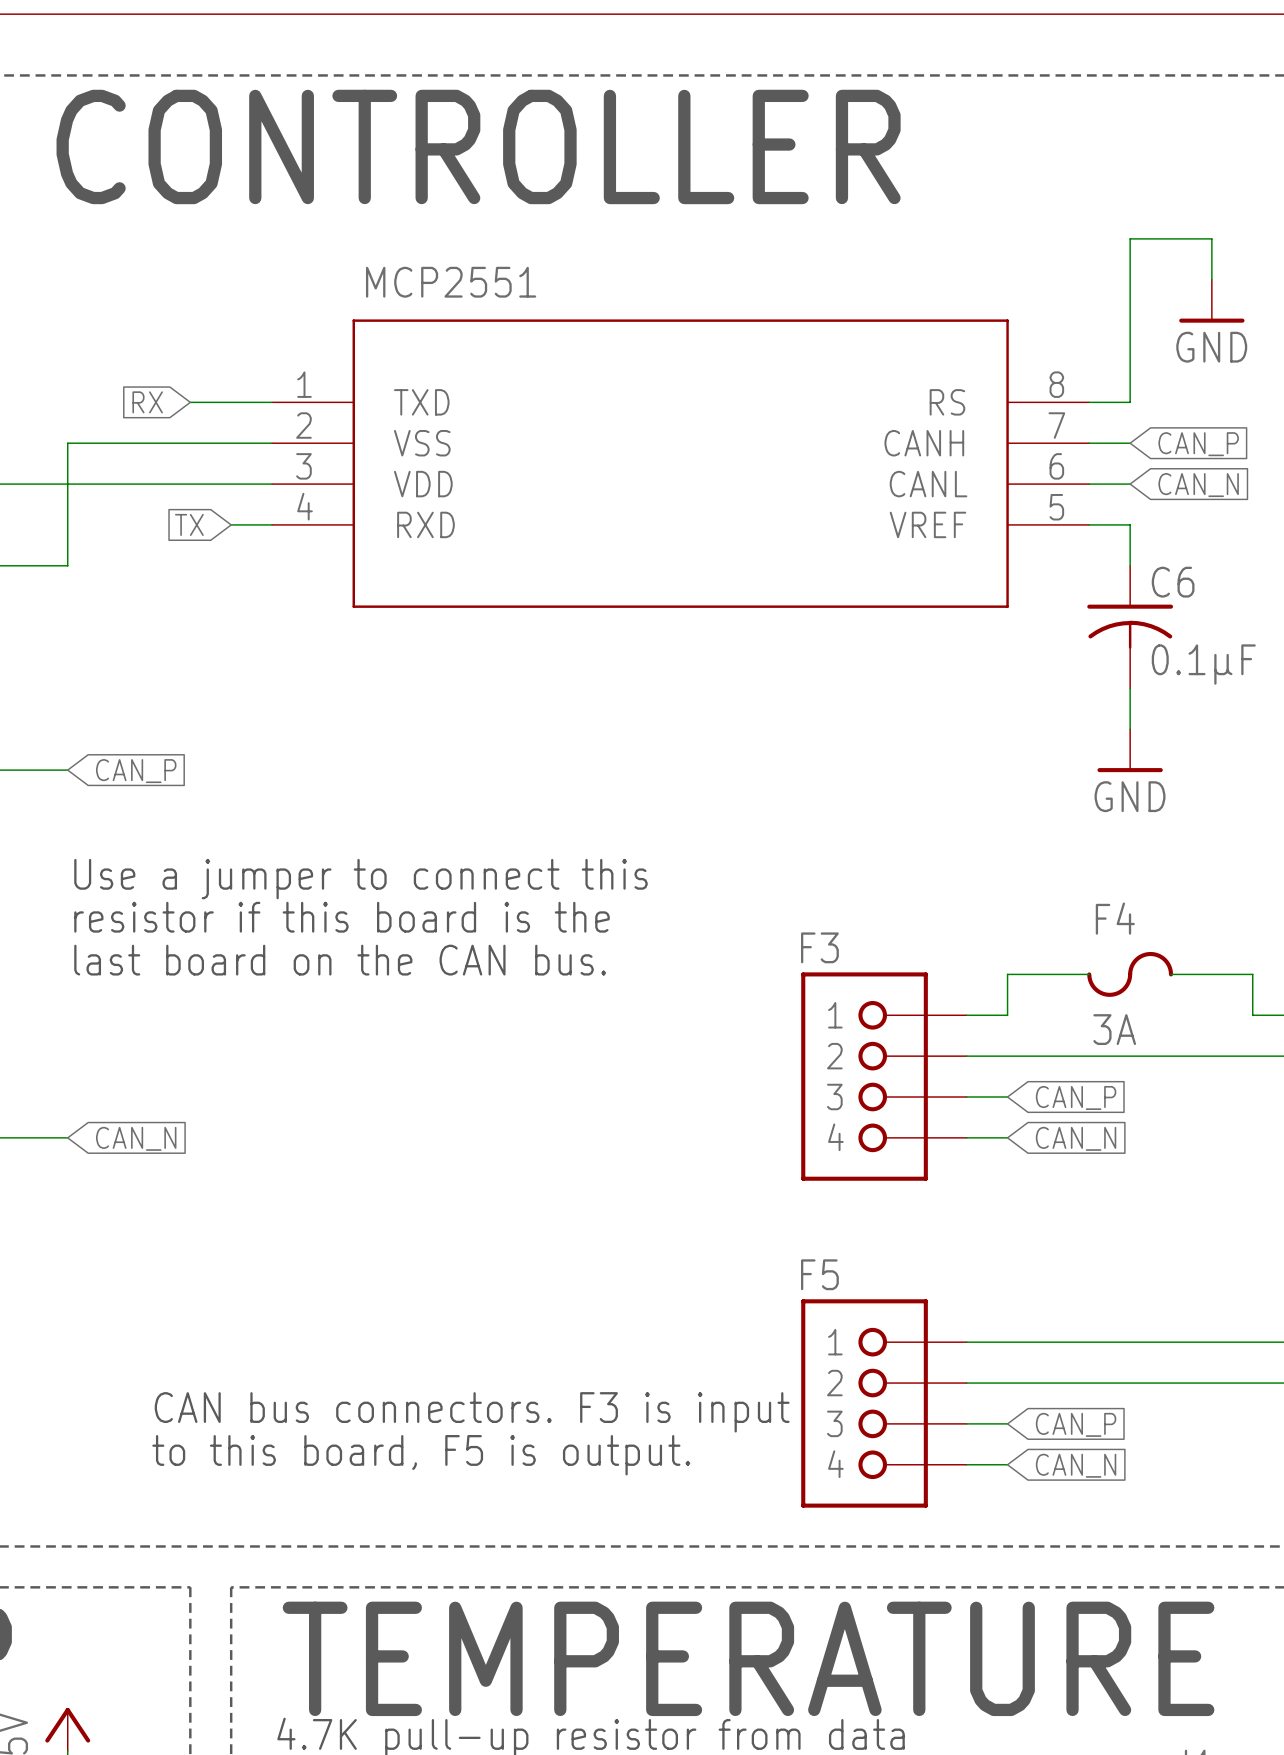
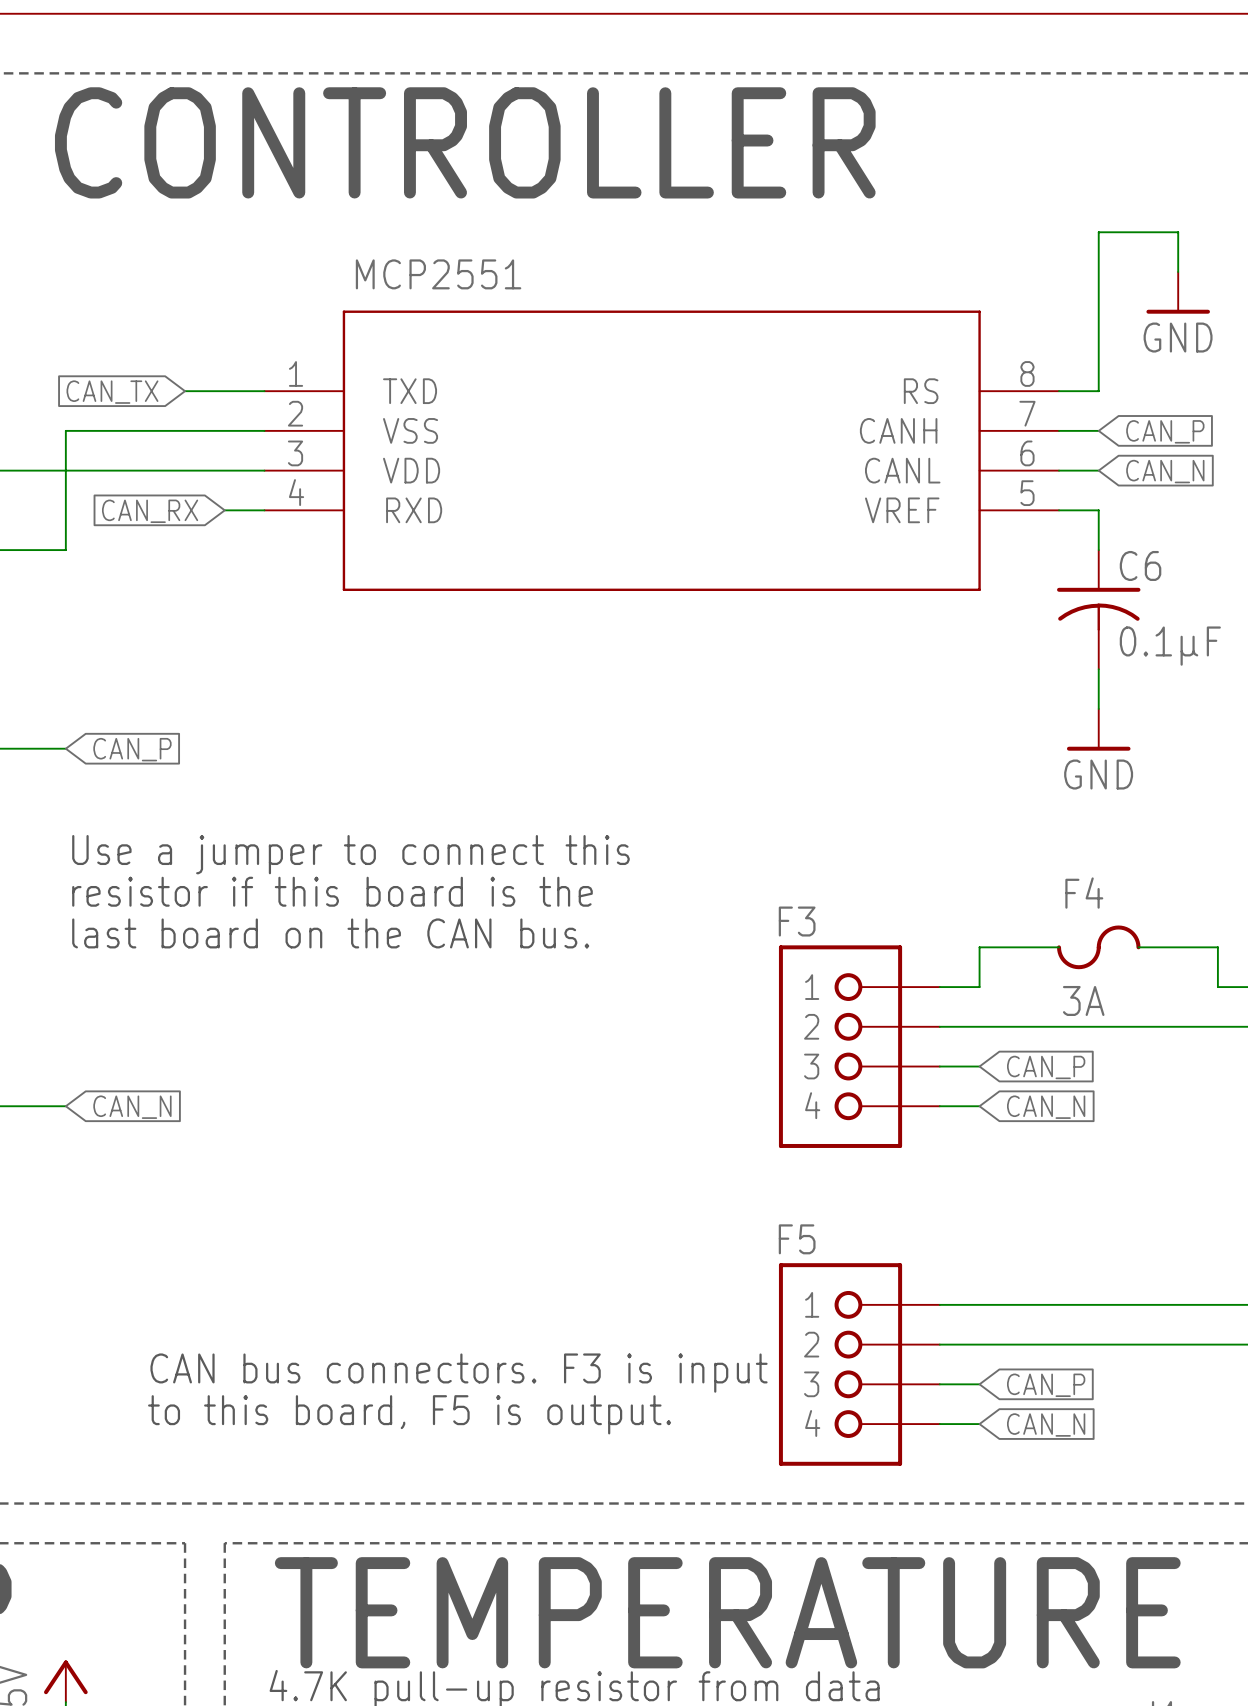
global label: RX (147, 402) -> CAN_TX (112, 392)
global label: TX (189, 524) -> CAN_RX (150, 511)

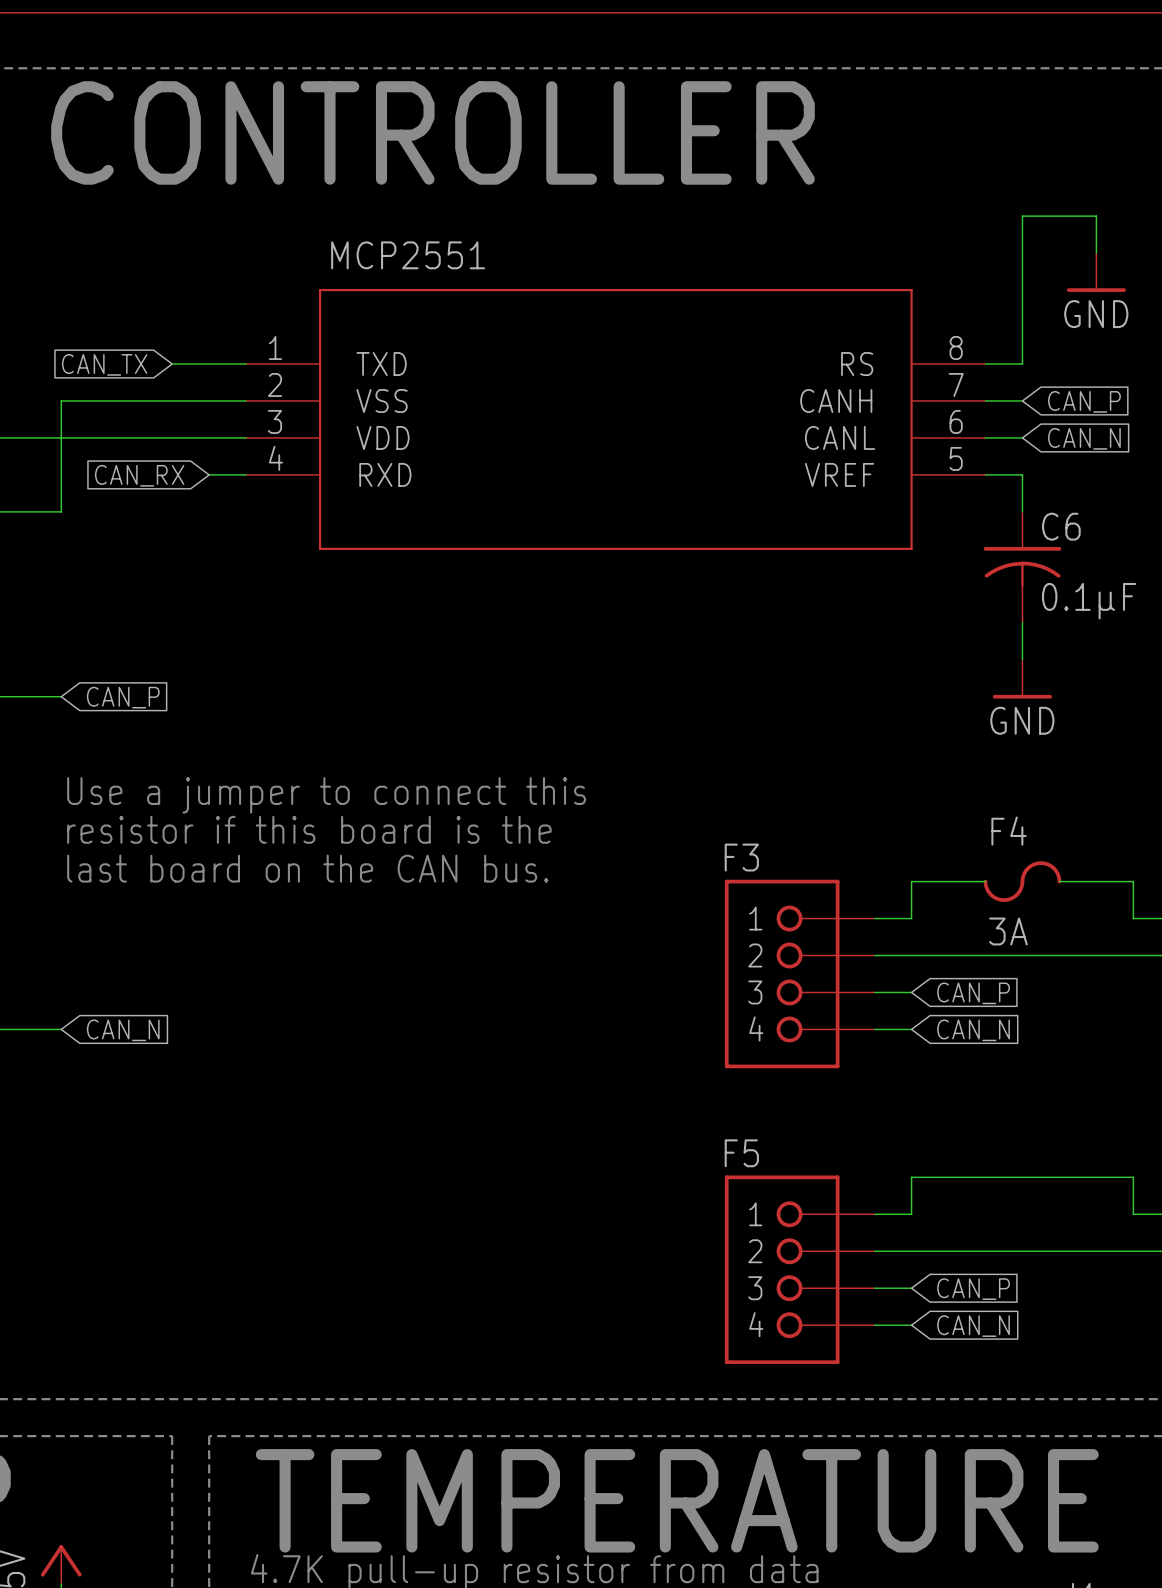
wire: (979, 1304) (1217, 1304) -> (911, 1214) (911, 1177) (1133, 1177) (1133, 1214)
text: CAN bus connectors. F3 is input (459, 1373) -> none
text: to this board, F5 is output. (409, 1414) -> none

